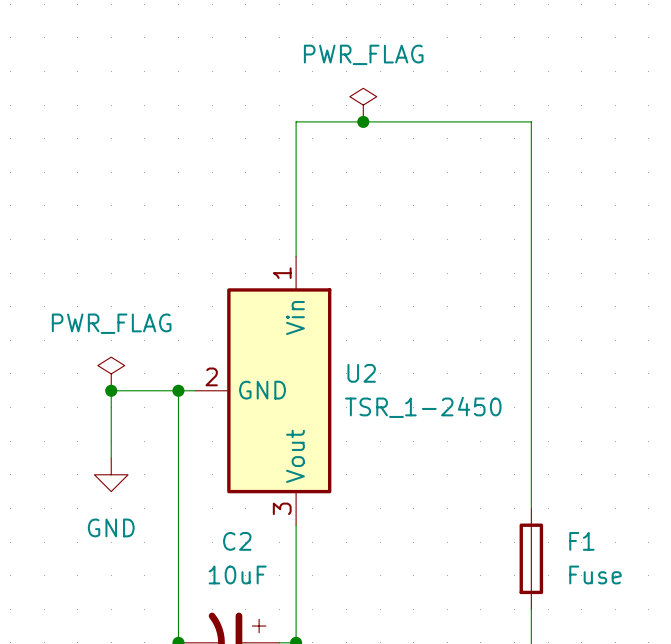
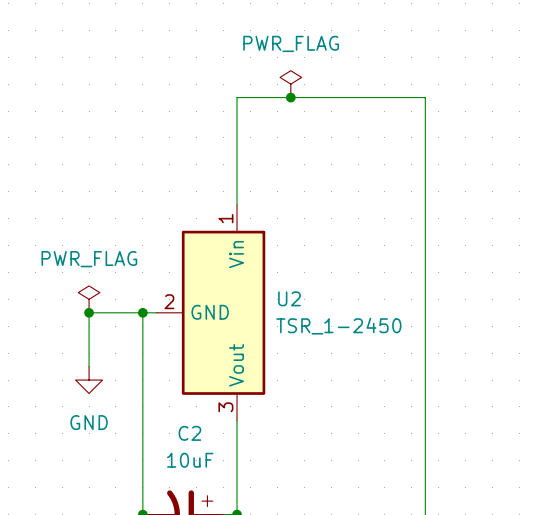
F1: Fuse (531, 558) -> none

